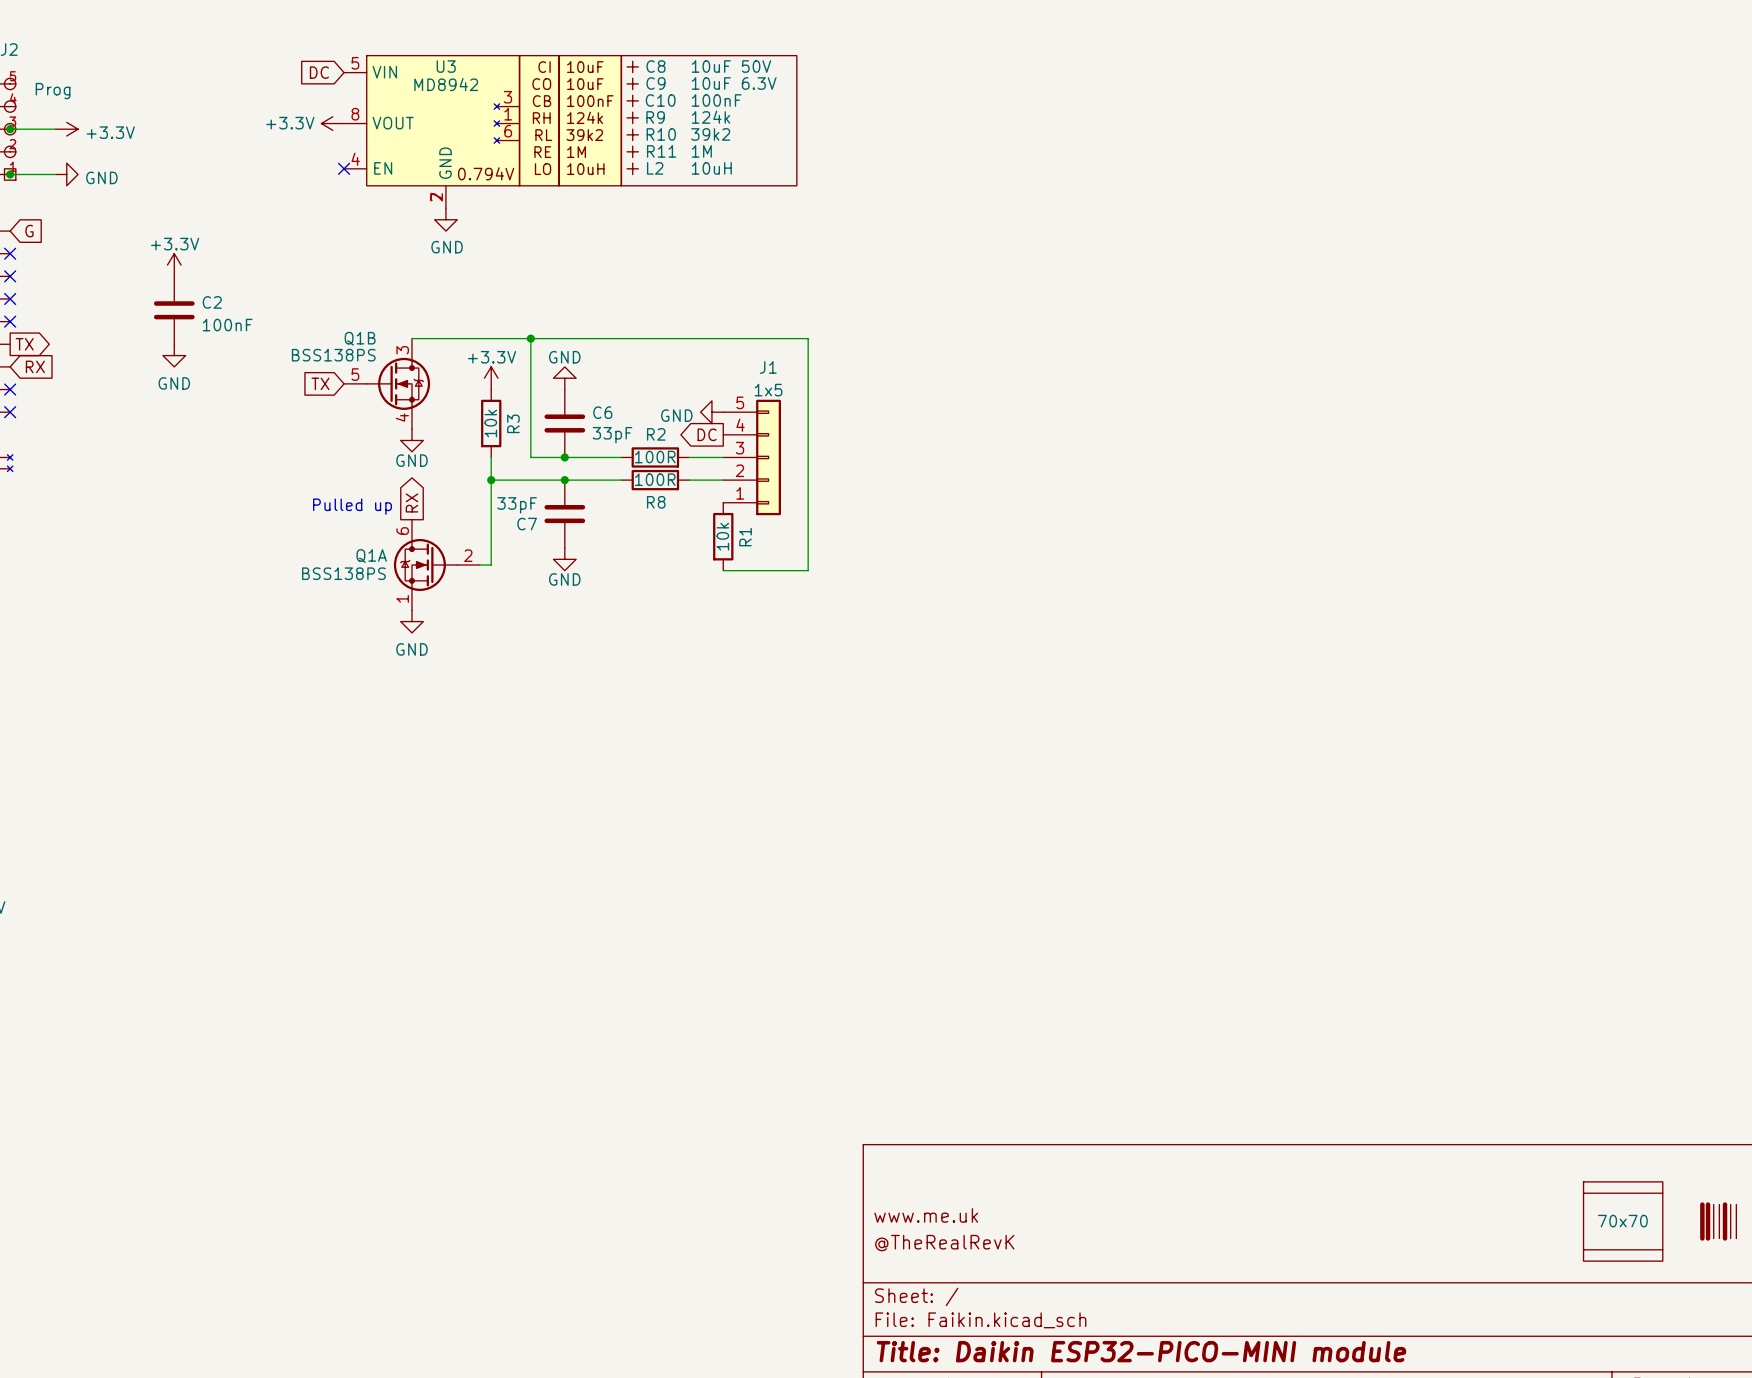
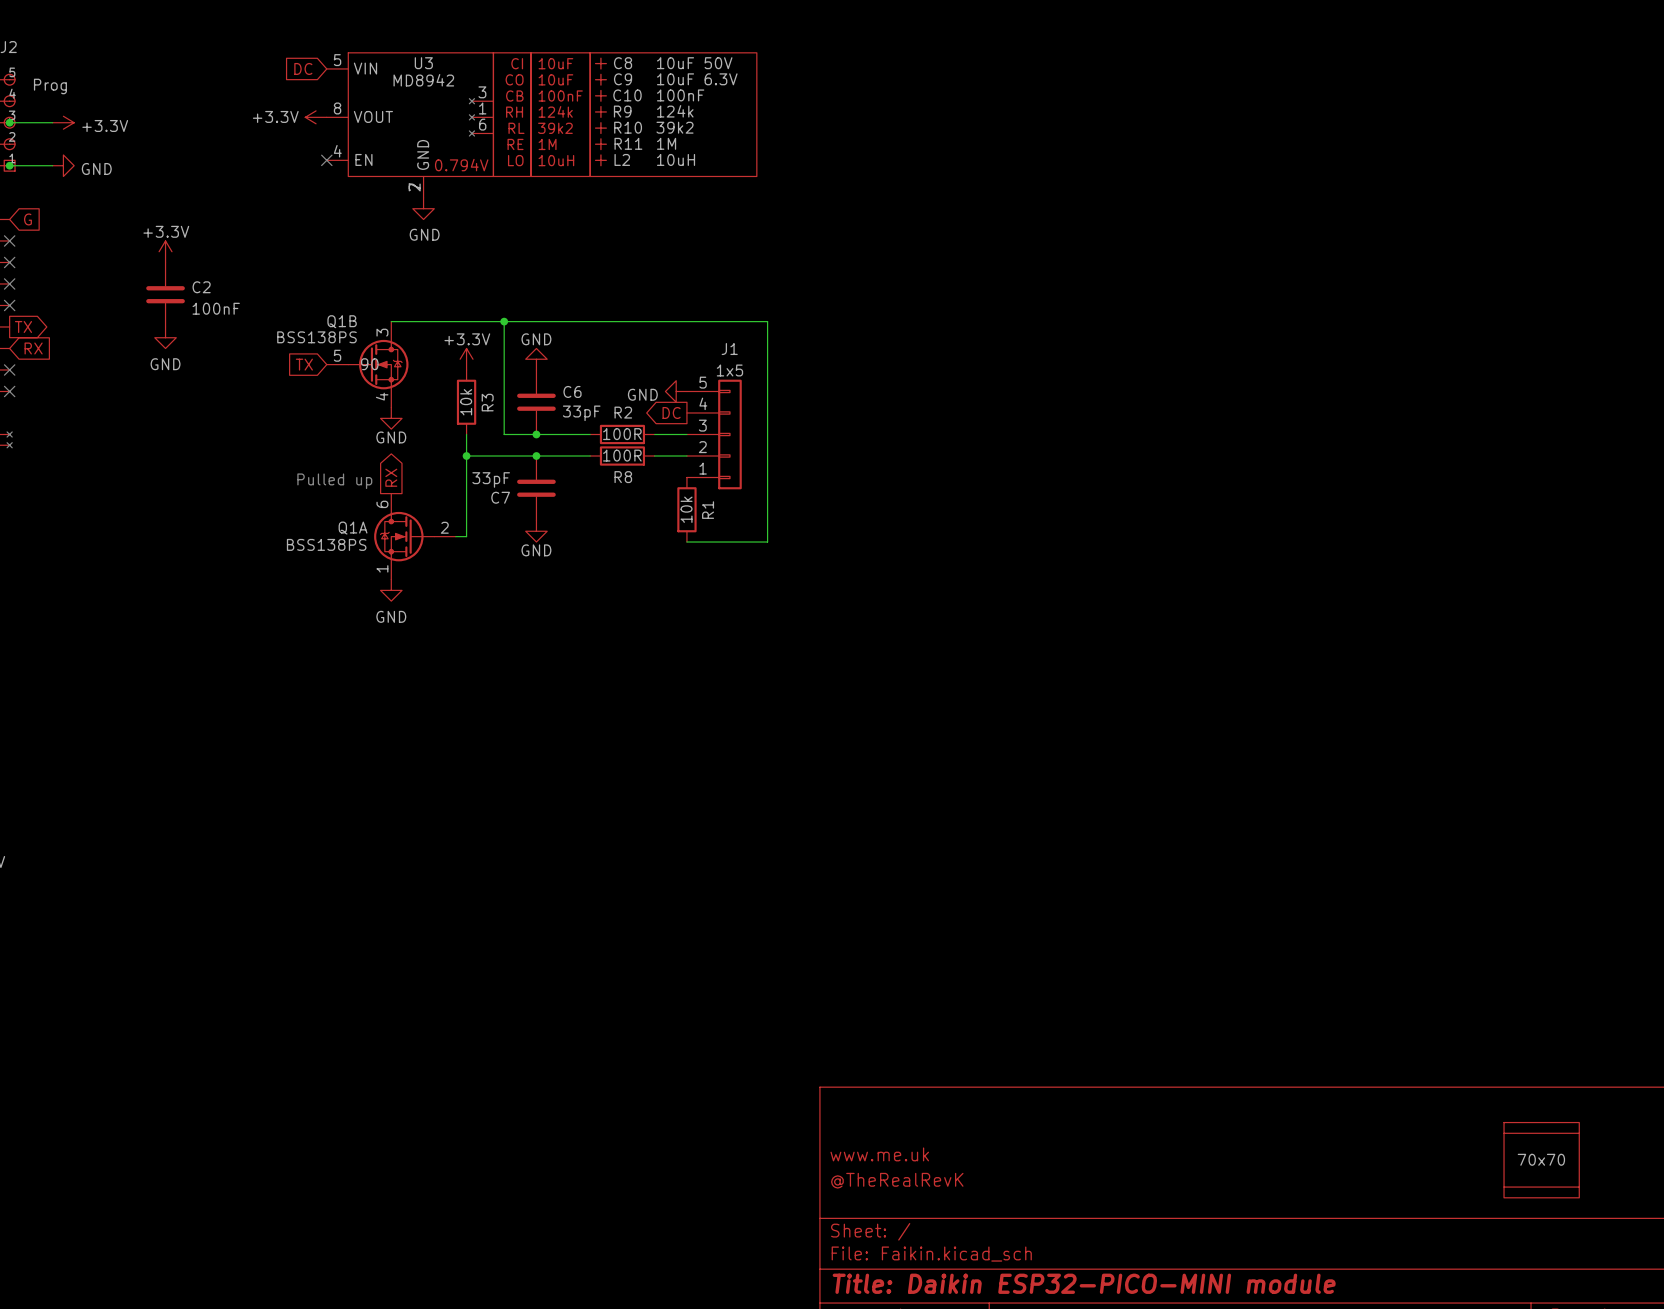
Q1B text: none -> 90 (369, 364)
part: (1718, 1221) -> none

